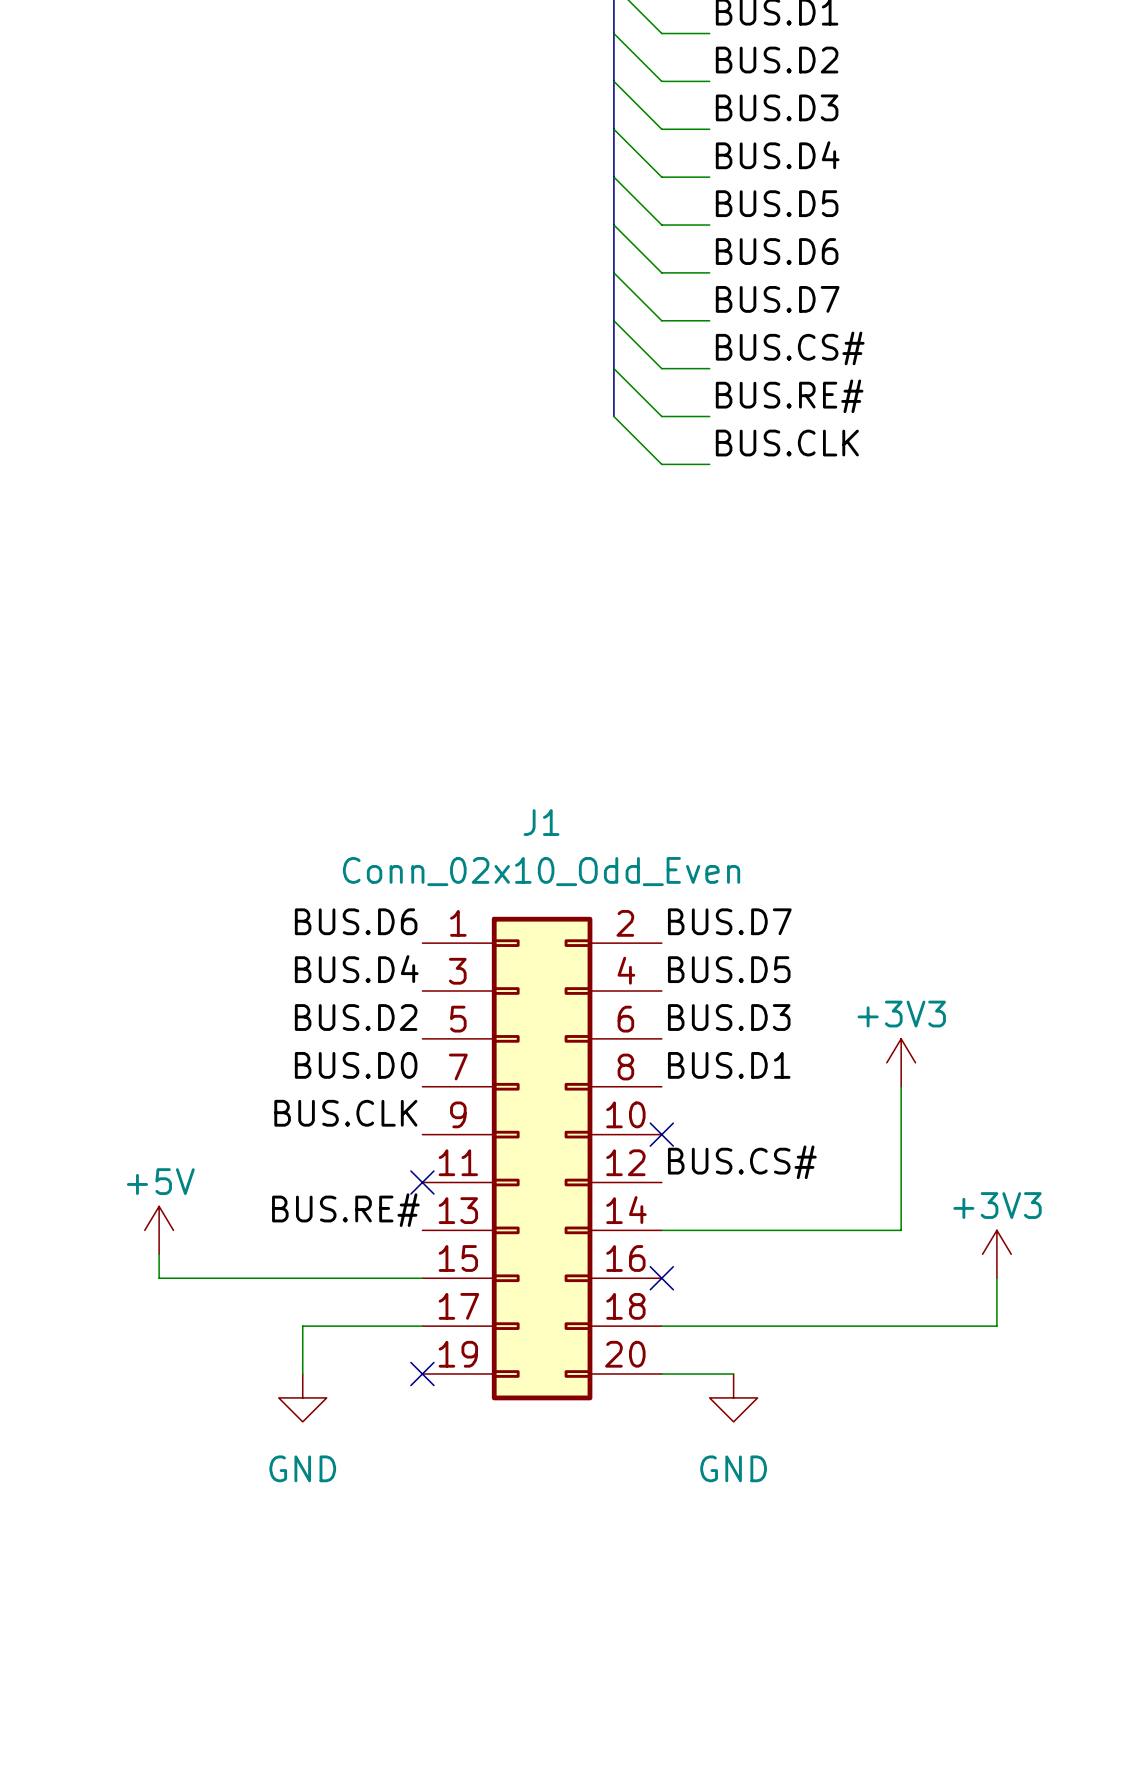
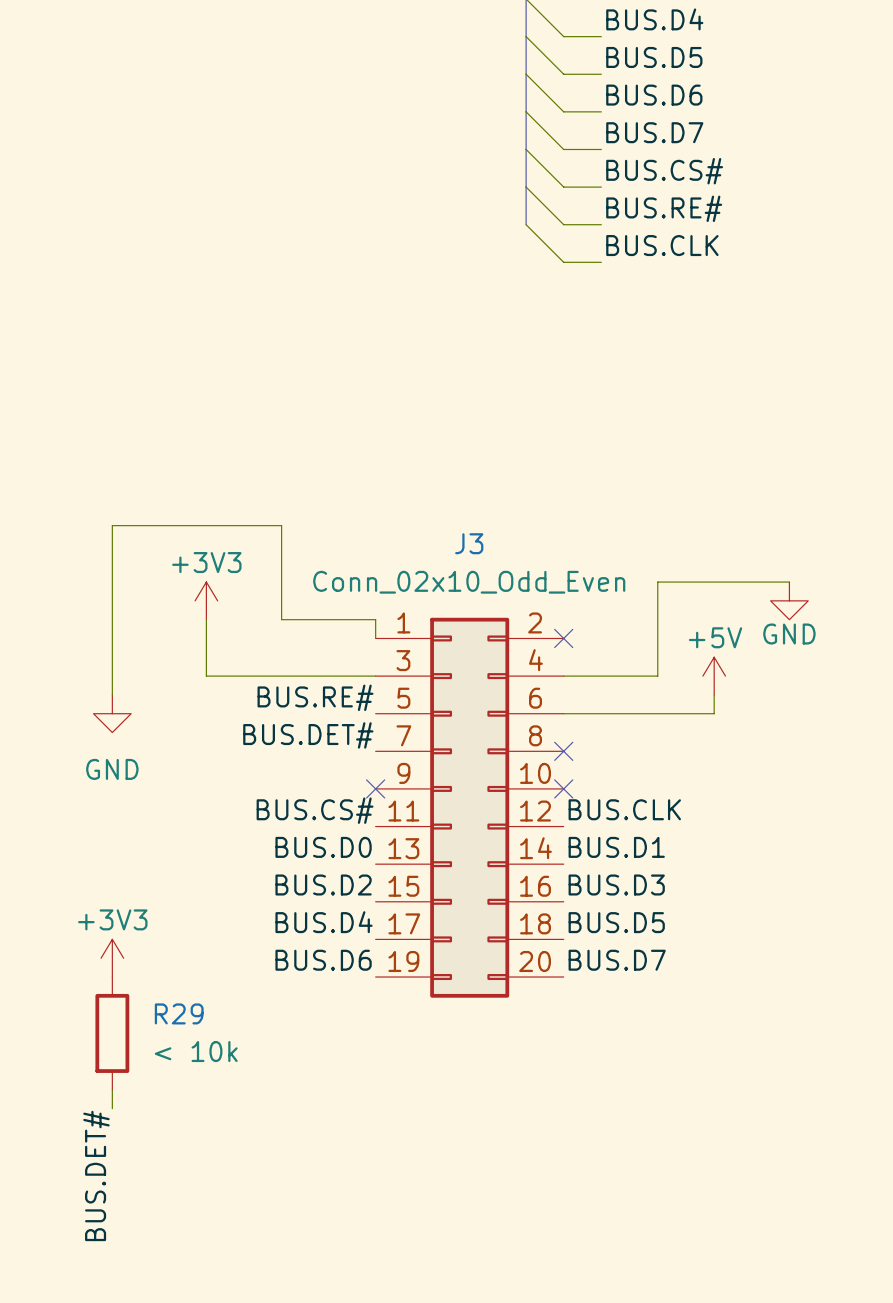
J1 name: J1 (541, 822) -> J3 (469, 543)
wire: none -> (789, 582) (657, 582) (657, 676) (563, 676)
power symbol: none -> +3V3 (206, 600)
power symbol: none -> GND (789, 600)
wire: none -> (206, 619) (206, 676) (375, 676)
label position: BUS.D6 (356, 921) -> BUS.D6 (323, 960)
label position: BUS.D7 (729, 921) -> BUS.D7 (617, 960)
wire: none -> (375, 638) (375, 619) (281, 619) (281, 525) (112, 525) (112, 694)
no-connect mark: none -> (563, 638)
label position: BUS.D4 (356, 969) -> BUS.D4 (324, 922)
label position: BUS.D5 (729, 969) -> BUS.D5 (616, 922)
power symbol: none -> +5V (714, 676)
wire: none -> (714, 694) (714, 713) (563, 713)
label: BUS.D2 (356, 1017) -> BUS.RE# (315, 697)
label position: BUS.D3 (729, 1017) -> BUS.D3 (616, 885)
power symbol: none -> GND (112, 713)
power symbol: +3V3 (901, 1062) -> none
label: BUS.D0 (356, 1065) -> BUS.DET# (308, 735)
label position: BUS.D1 (729, 1065) -> BUS.D1 (616, 847)
no-connect mark: none -> (563, 751)
wire: (901, 1086) (901, 1230) (661, 1230) -> none
label: BUS.CLK (345, 1113) -> BUS.CS# (315, 810)
label: BUS.CS# (742, 1162) -> BUS.CLK (624, 809)
no-connect mark position: (422, 1182) -> (375, 788)
label: BUS.RE# (345, 1210) -> BUS.D0 (323, 847)
power symbol: +5V (159, 1230) -> none
wire: (159, 1254) (159, 1278) (422, 1278) -> none
power symbol: +3V3 (996, 1254) -> none
label: none -> BUS.D2 (323, 885)
no-connect mark: (661, 1278) -> none
wire: (996, 1278) (996, 1326) (661, 1326) -> none
wire: (422, 1326) (302, 1326) (302, 1373) -> none
power symbol: none -> +3V3 (112, 958)
no-connect mark: (422, 1373) -> none
wire: (661, 1373) (733, 1373) -> none
power symbol: GND (302, 1397) -> none
power symbol: GND (733, 1397) -> none
R29: none -> < 10k (112, 1033)
wire: none -> (112, 1089) (112, 1108)
label: none -> BUS.DET# (96, 1175)

